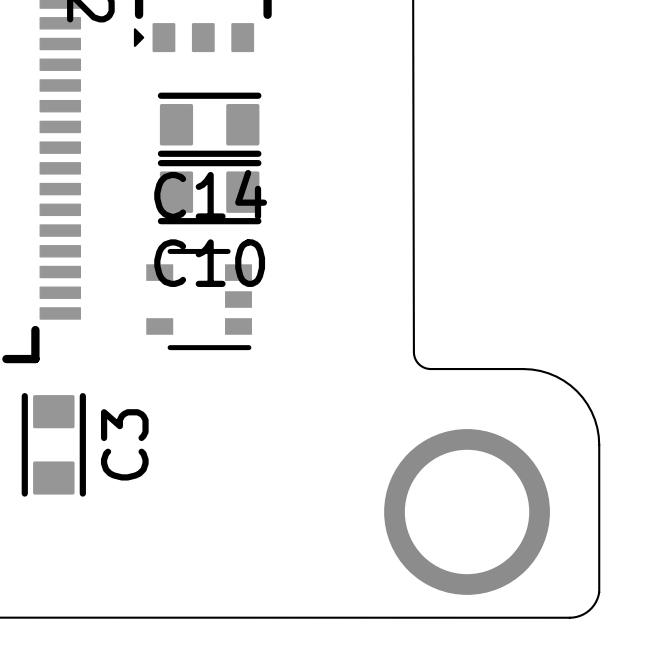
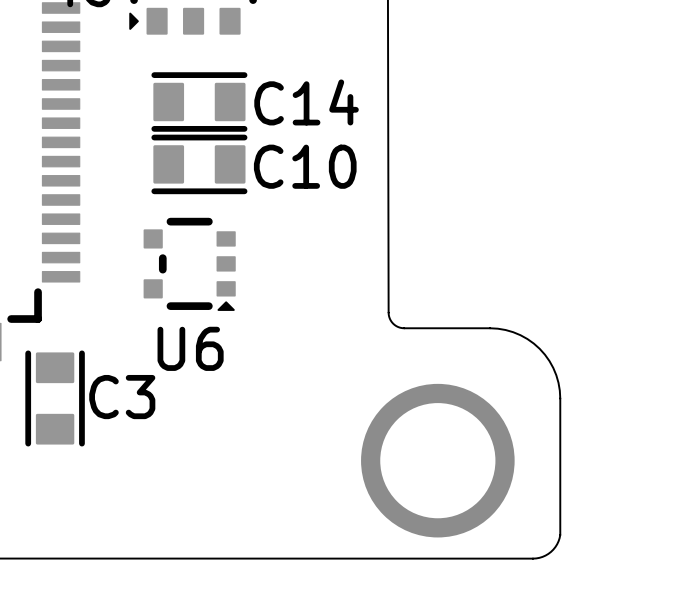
C14 name position: C14 (210, 194) -> C14 (306, 102)
C10 name position: C10 (209, 263) -> C10 (305, 166)
part: (199, 299) -> none
U6: none -> (189, 264)
C3 name rotation: 0° (124, 444) -> 90° clockwise (122, 397)

